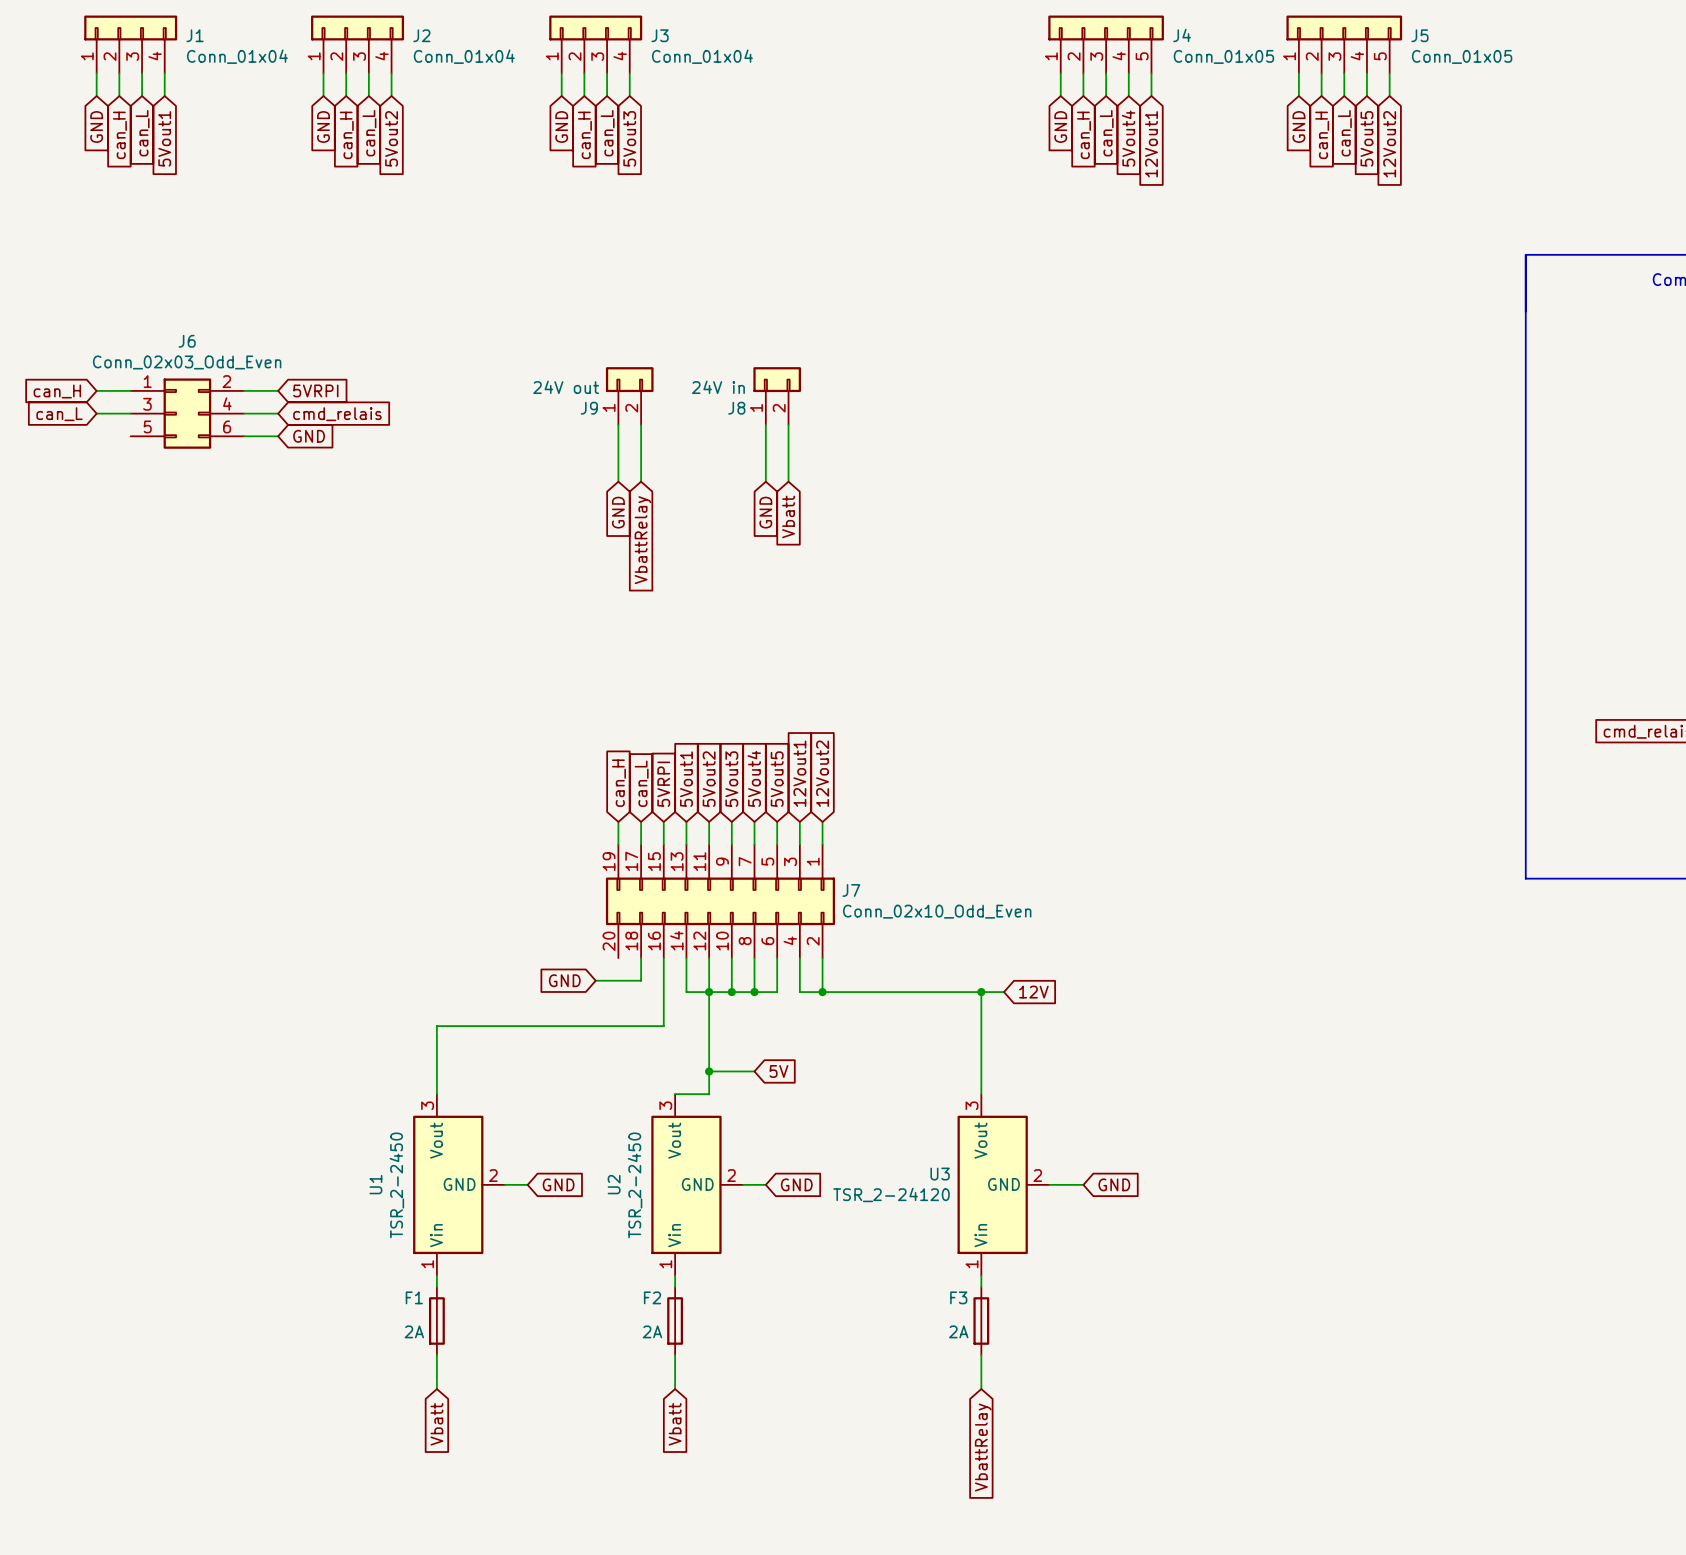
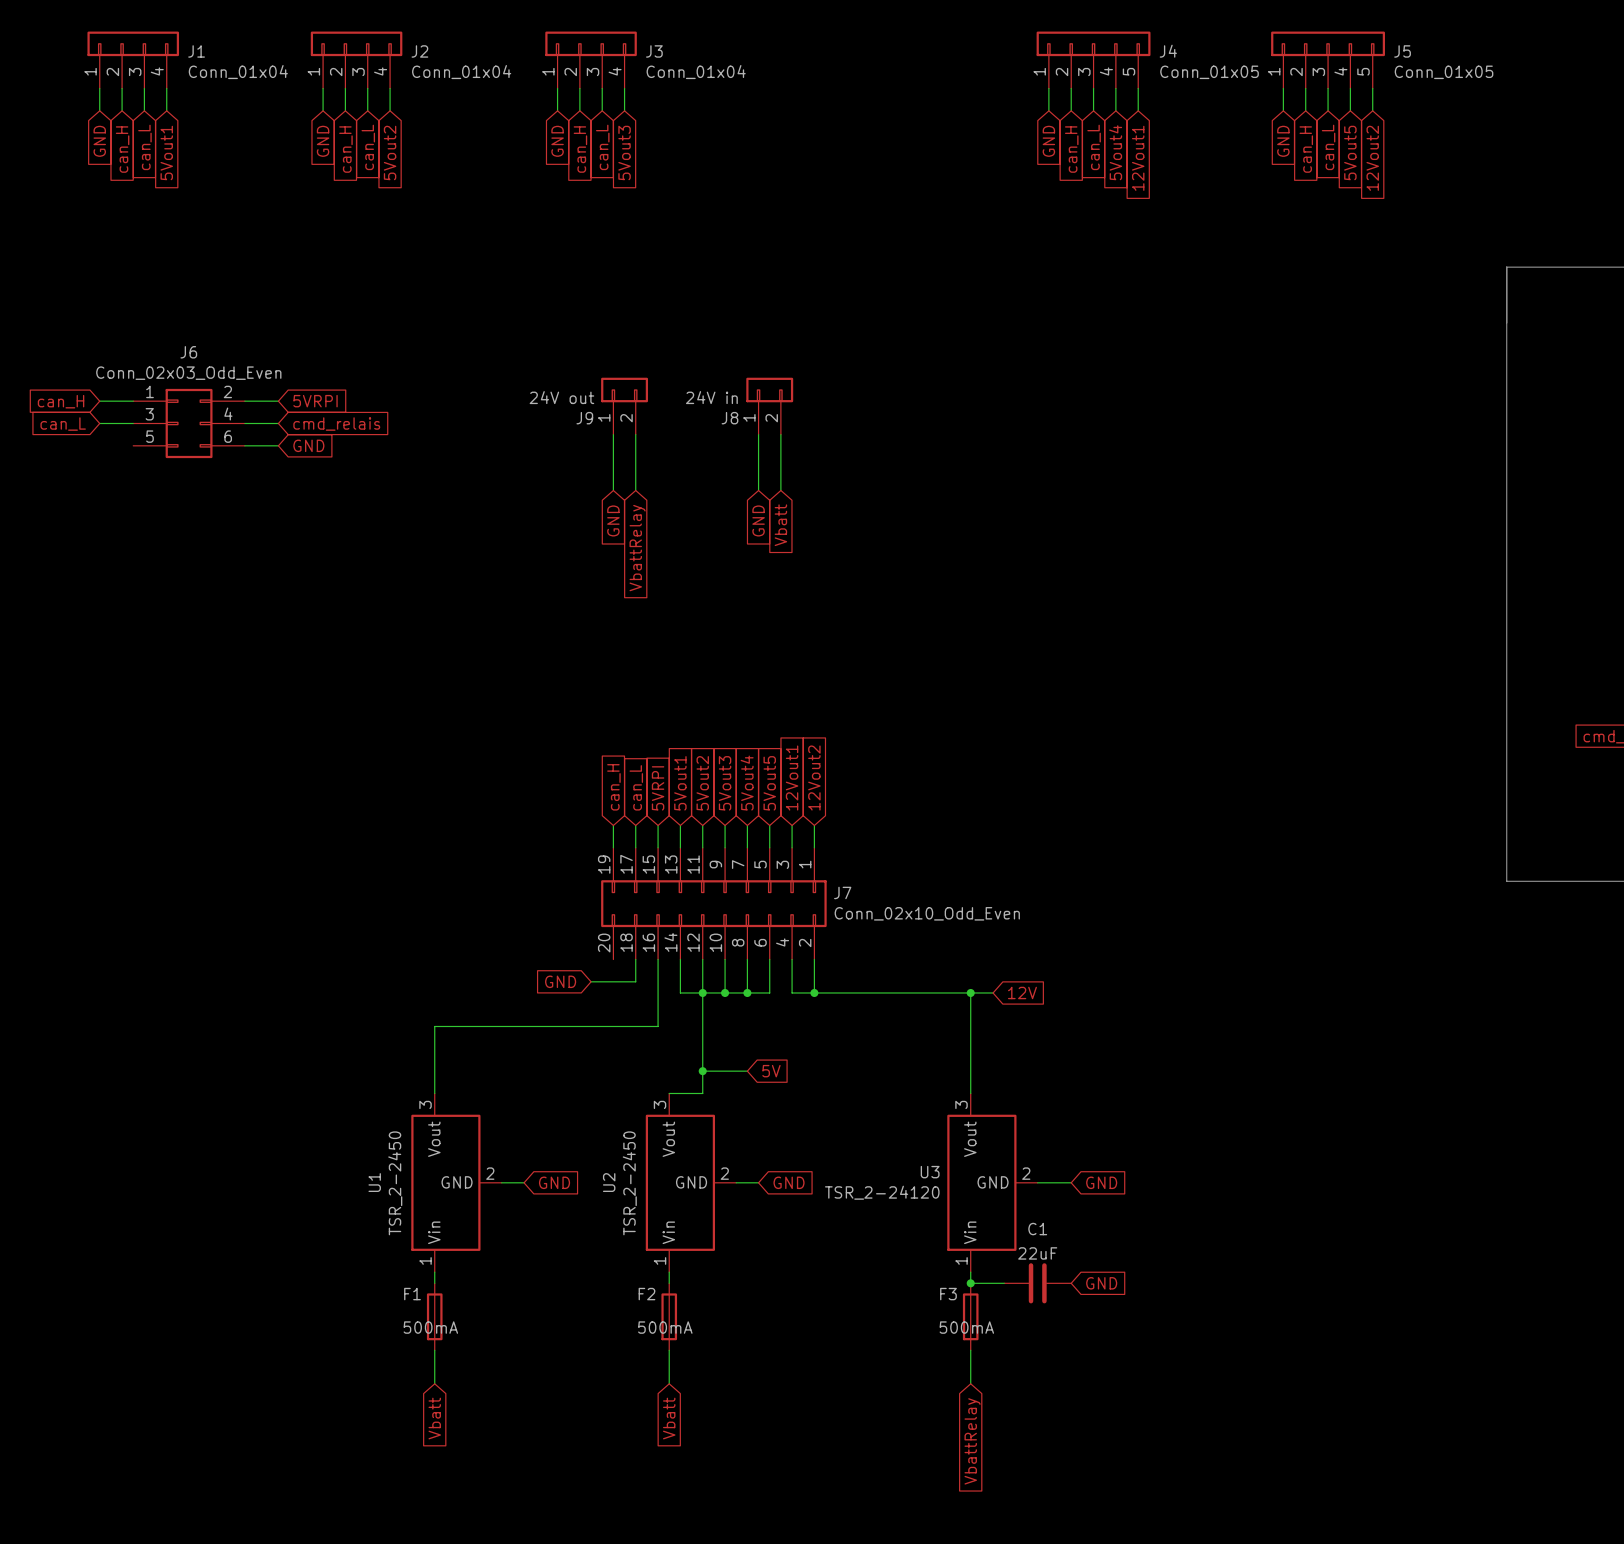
wire: none -> (970, 1283) (1004, 1283)
junction: none -> (970, 1283)
C1: none -> 22uF (1037, 1283)
global label: none -> GND (1101, 1283)
F1 value: 2A (414, 1331) -> 500mA (430, 1327)
F2 value: 2A (652, 1331) -> 500mA (665, 1327)
F3 value: 2A (958, 1331) -> 500mA (966, 1327)

